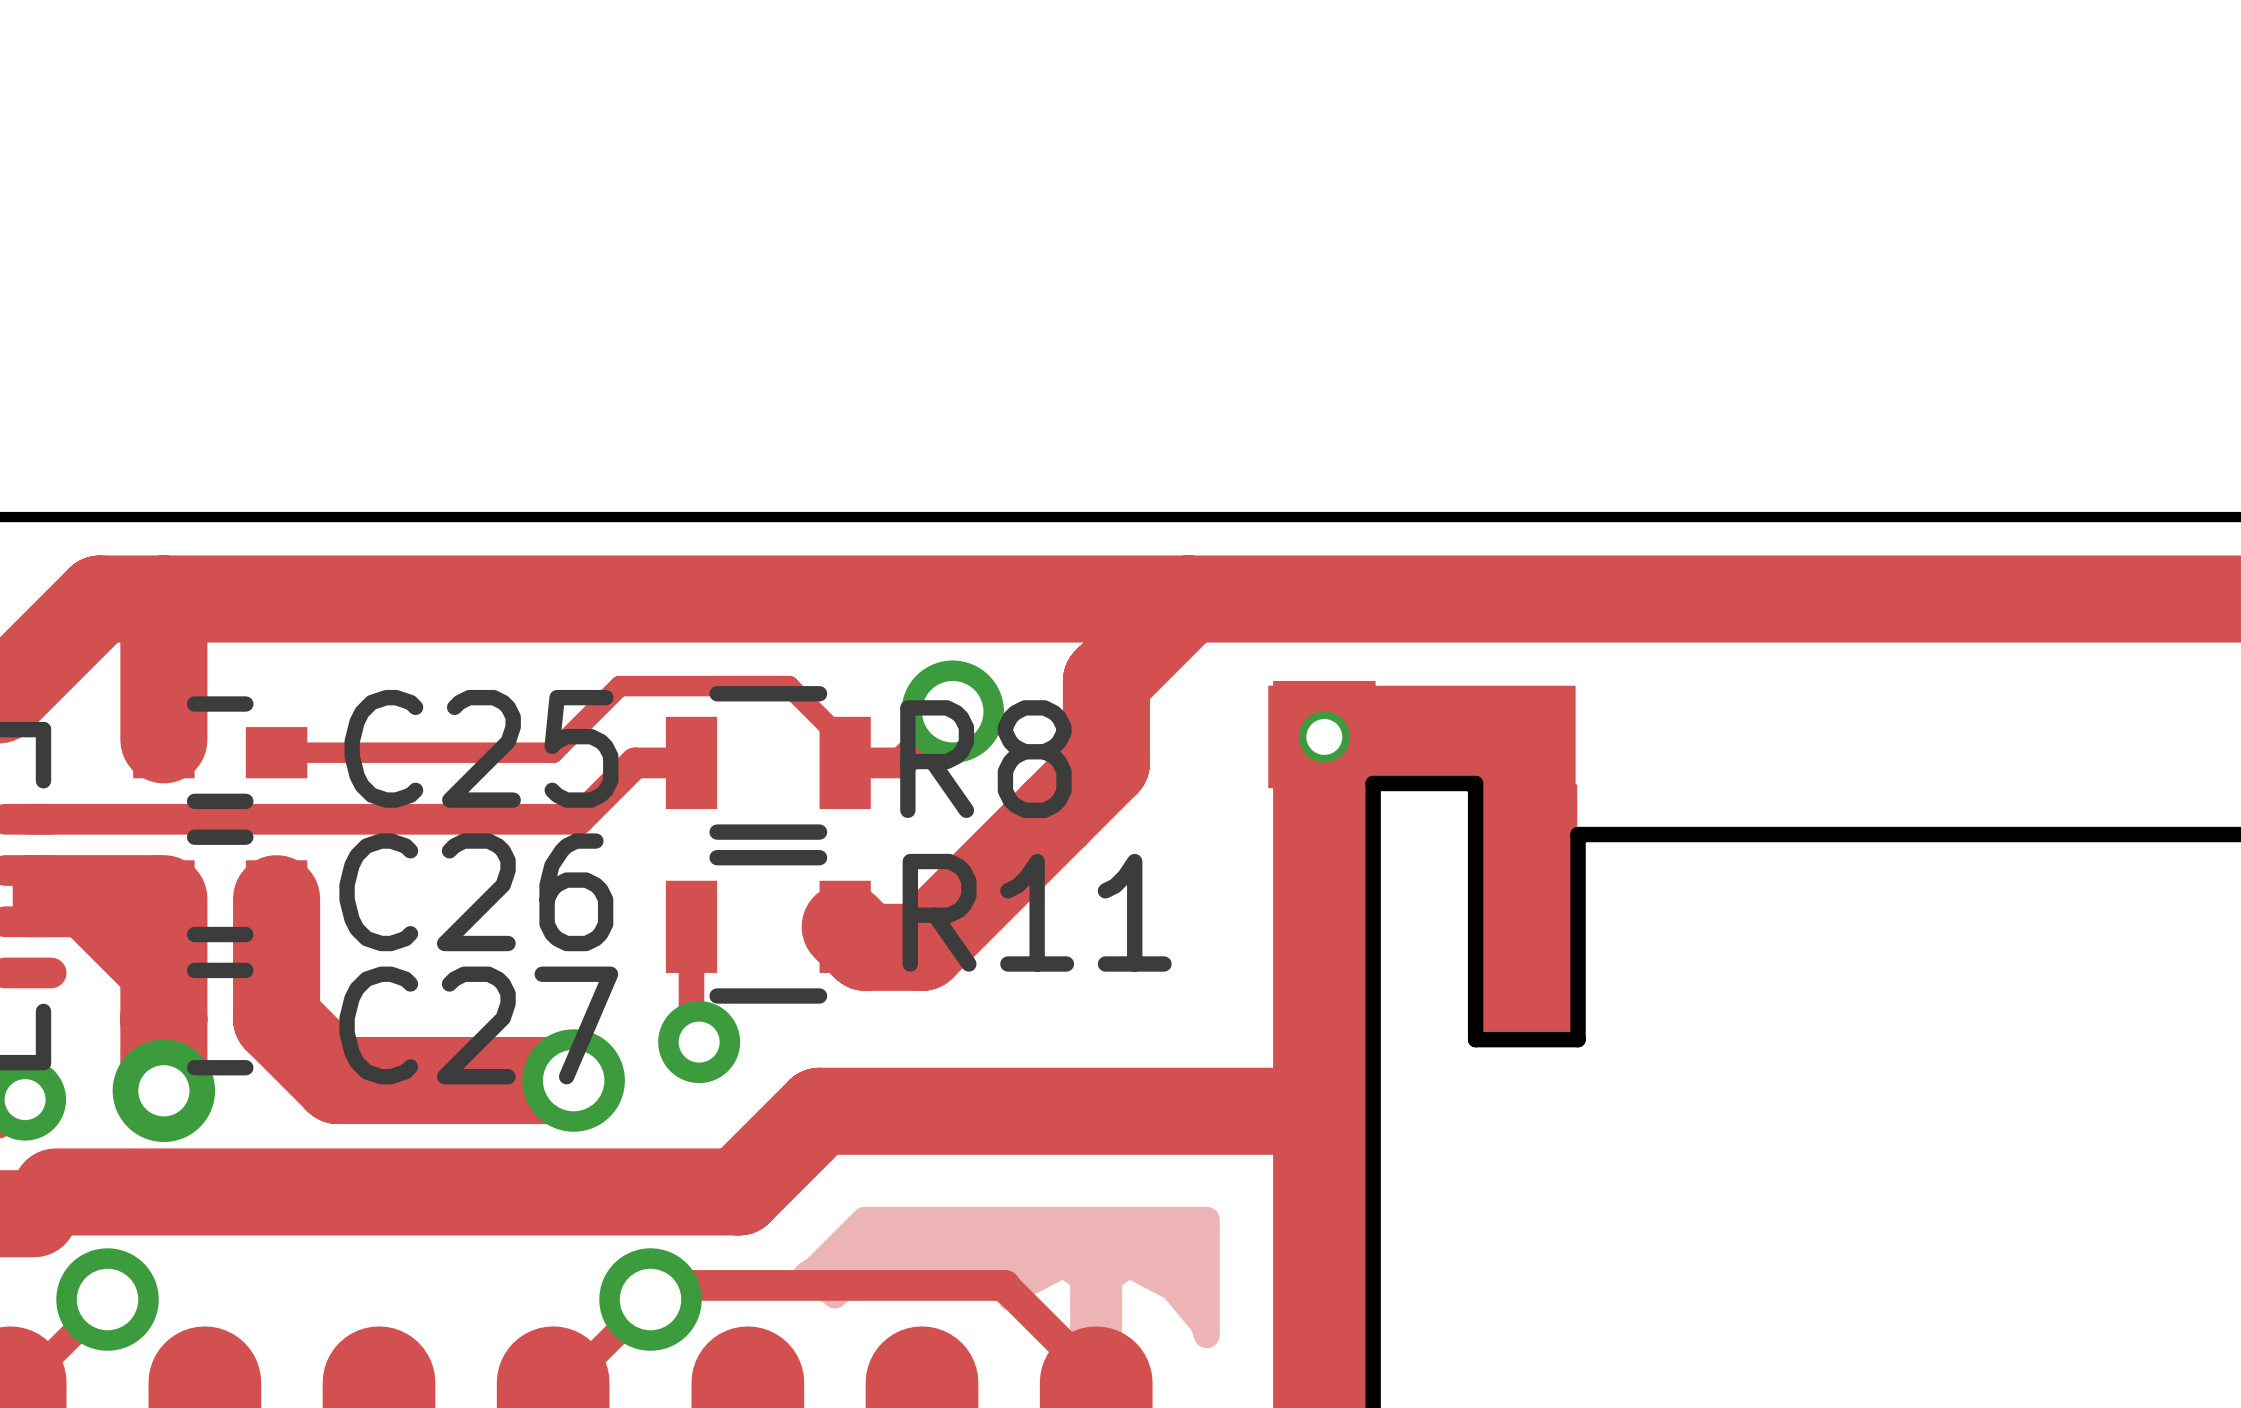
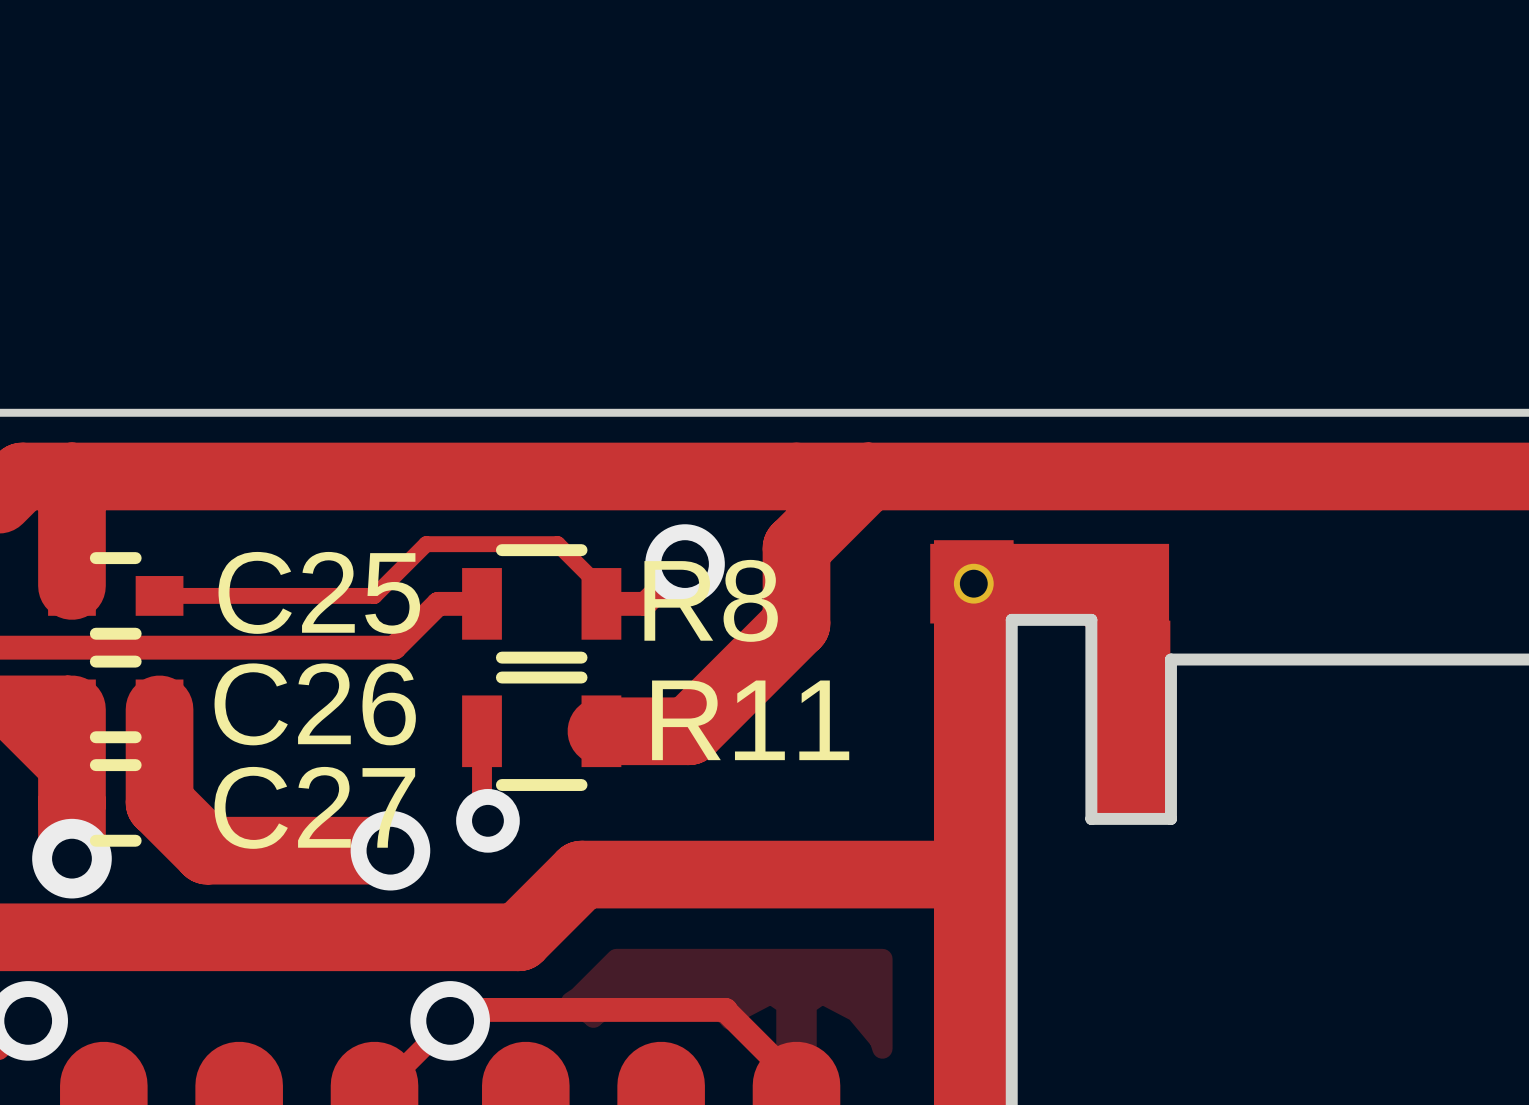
track: (1106, 680) (1106, 762) (922, 947) (865, 947) (845, 926) -> (804, 540) (796, 548) (796, 623) (689, 731) (601, 731)

